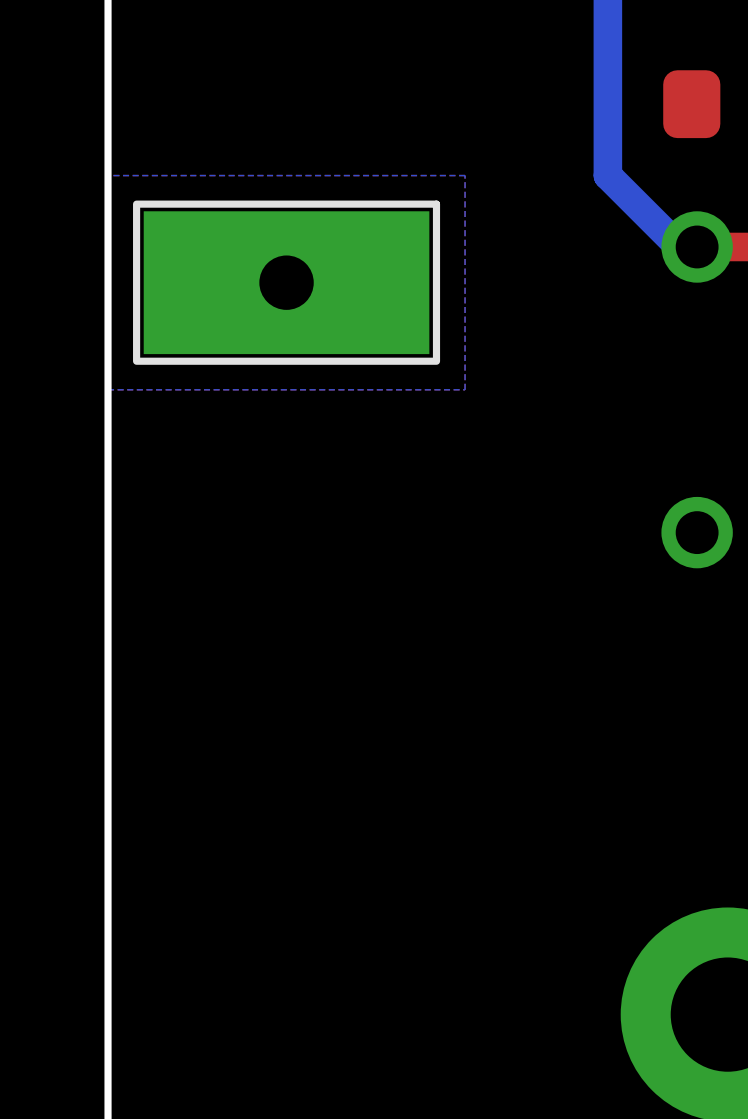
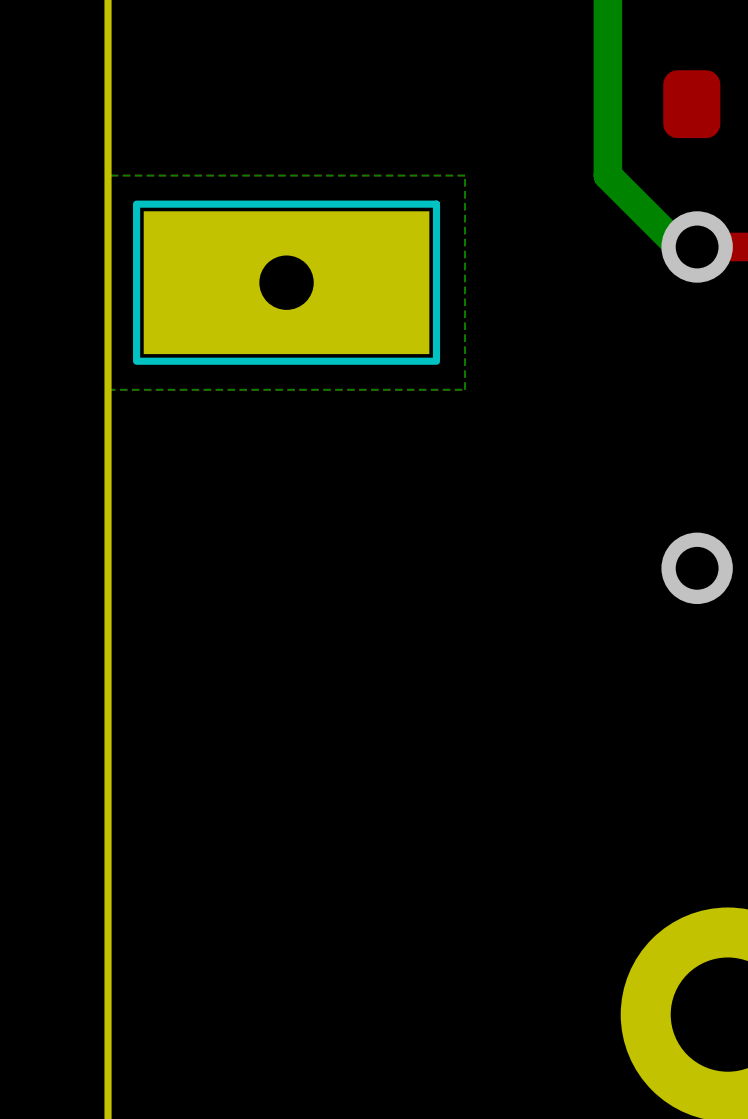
via position: (697, 532) -> (697, 568)

